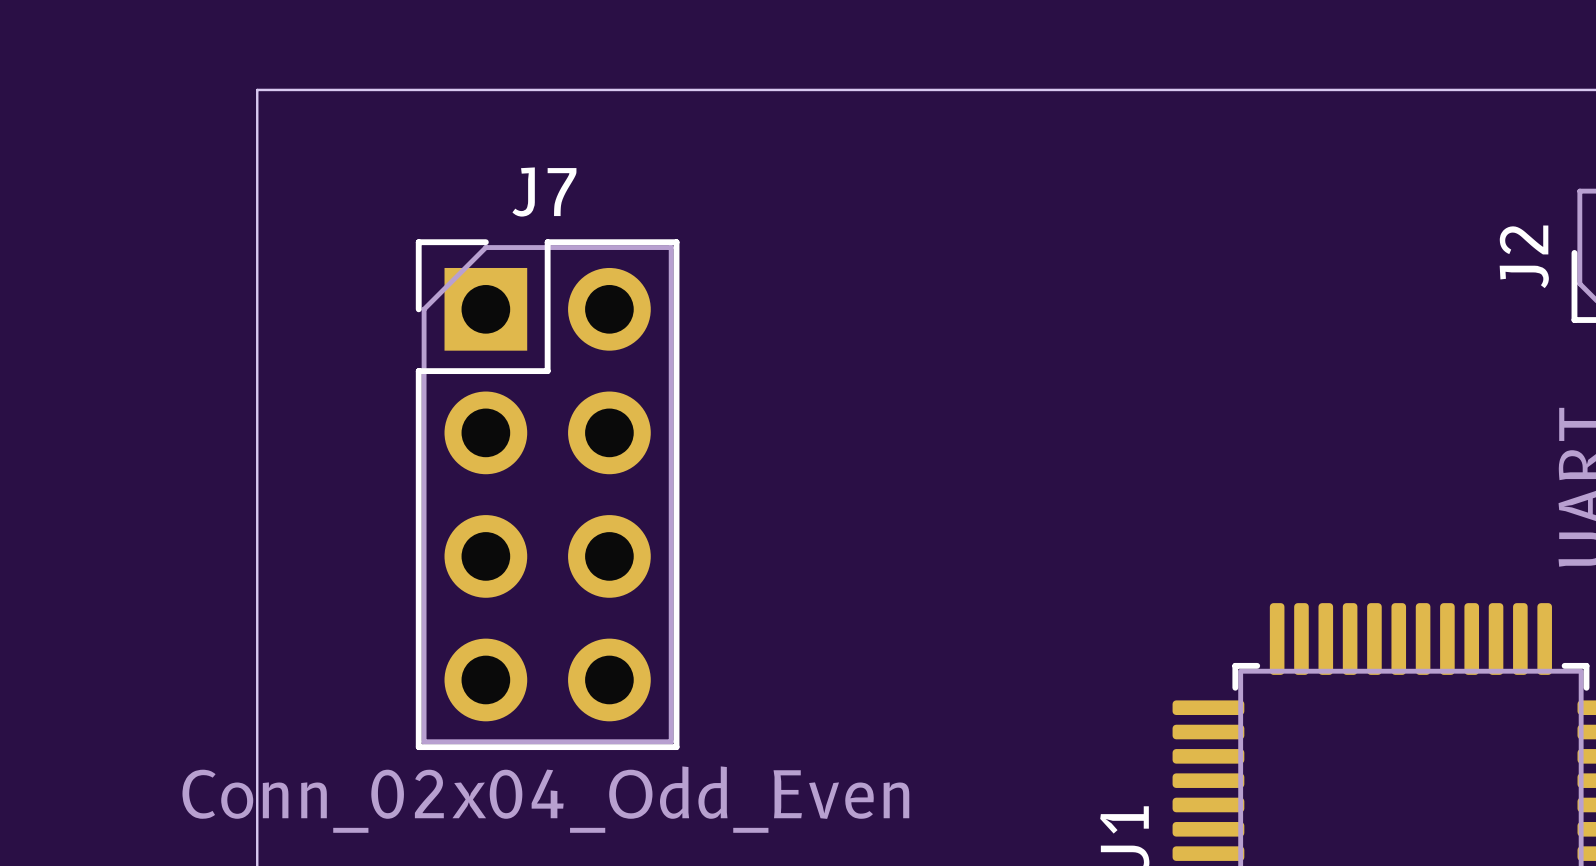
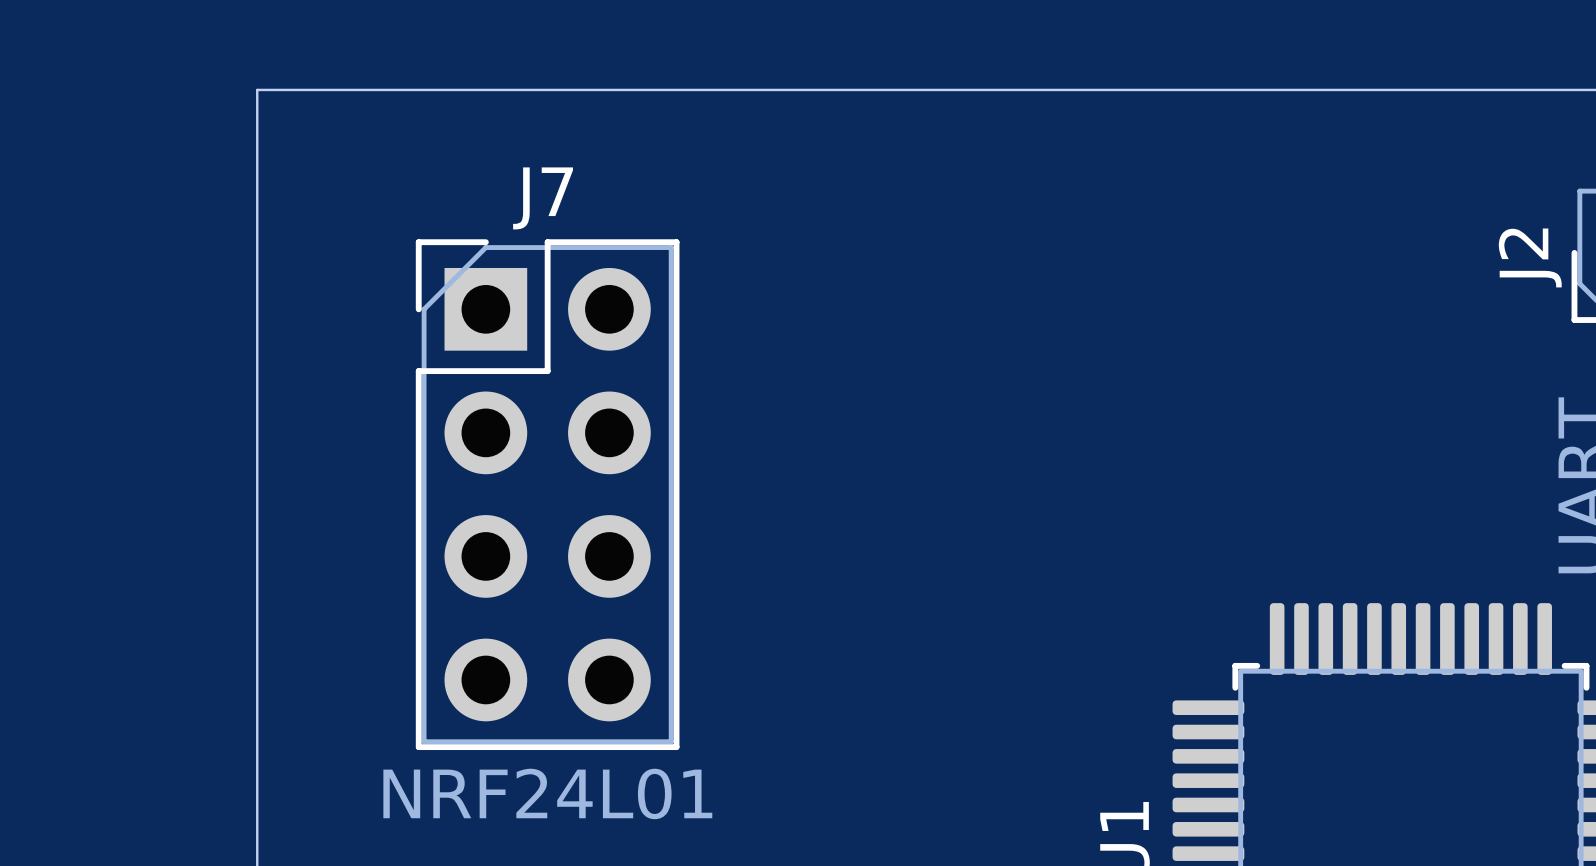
J7 value: Conn_02x04_Odd_Even (545, 799) -> NRF24L01 (547, 793)

